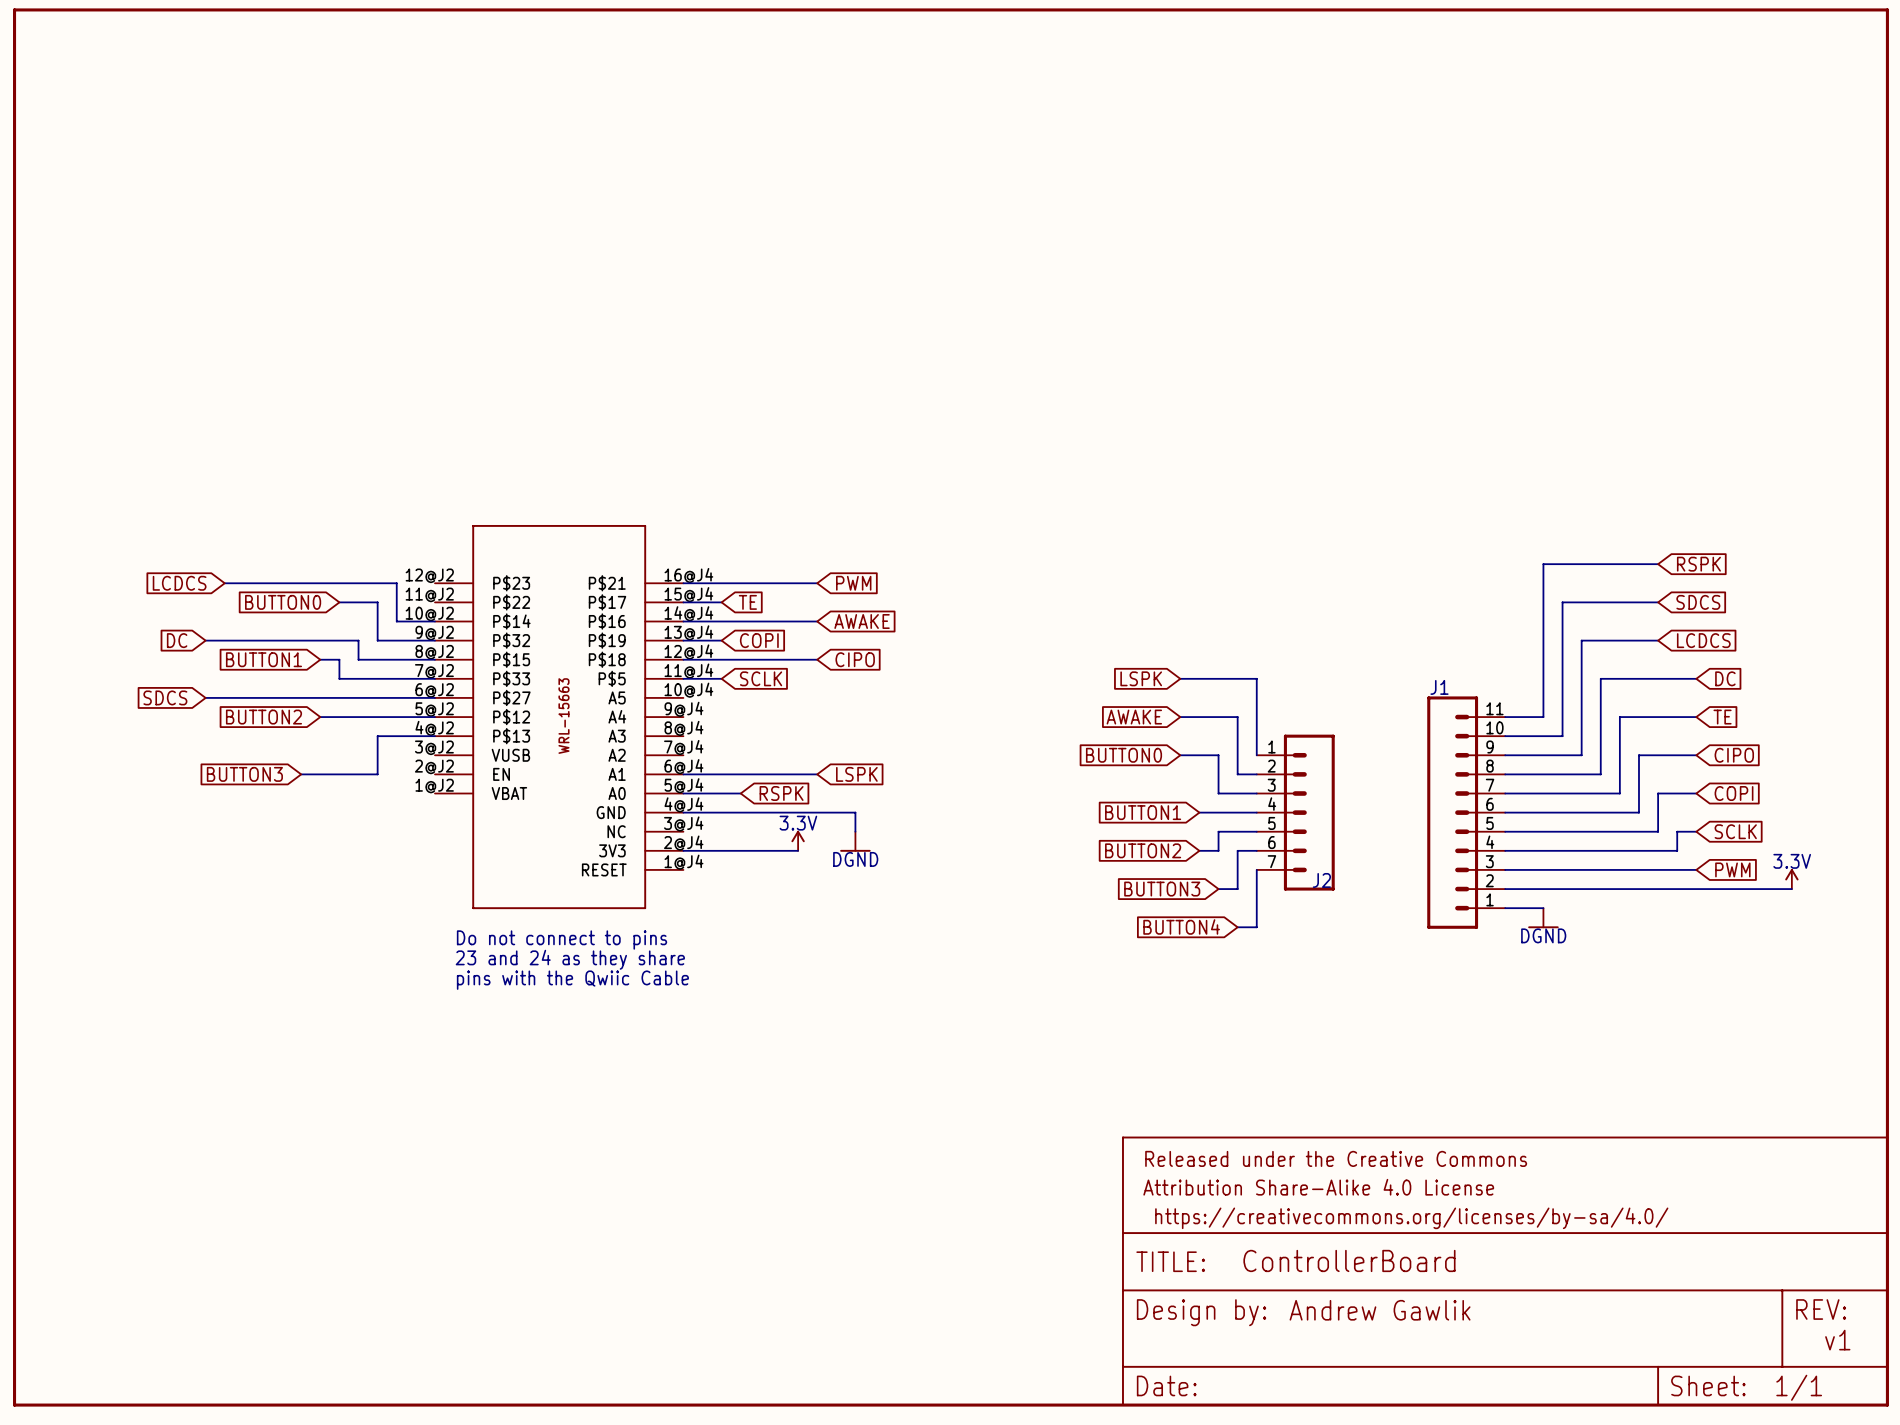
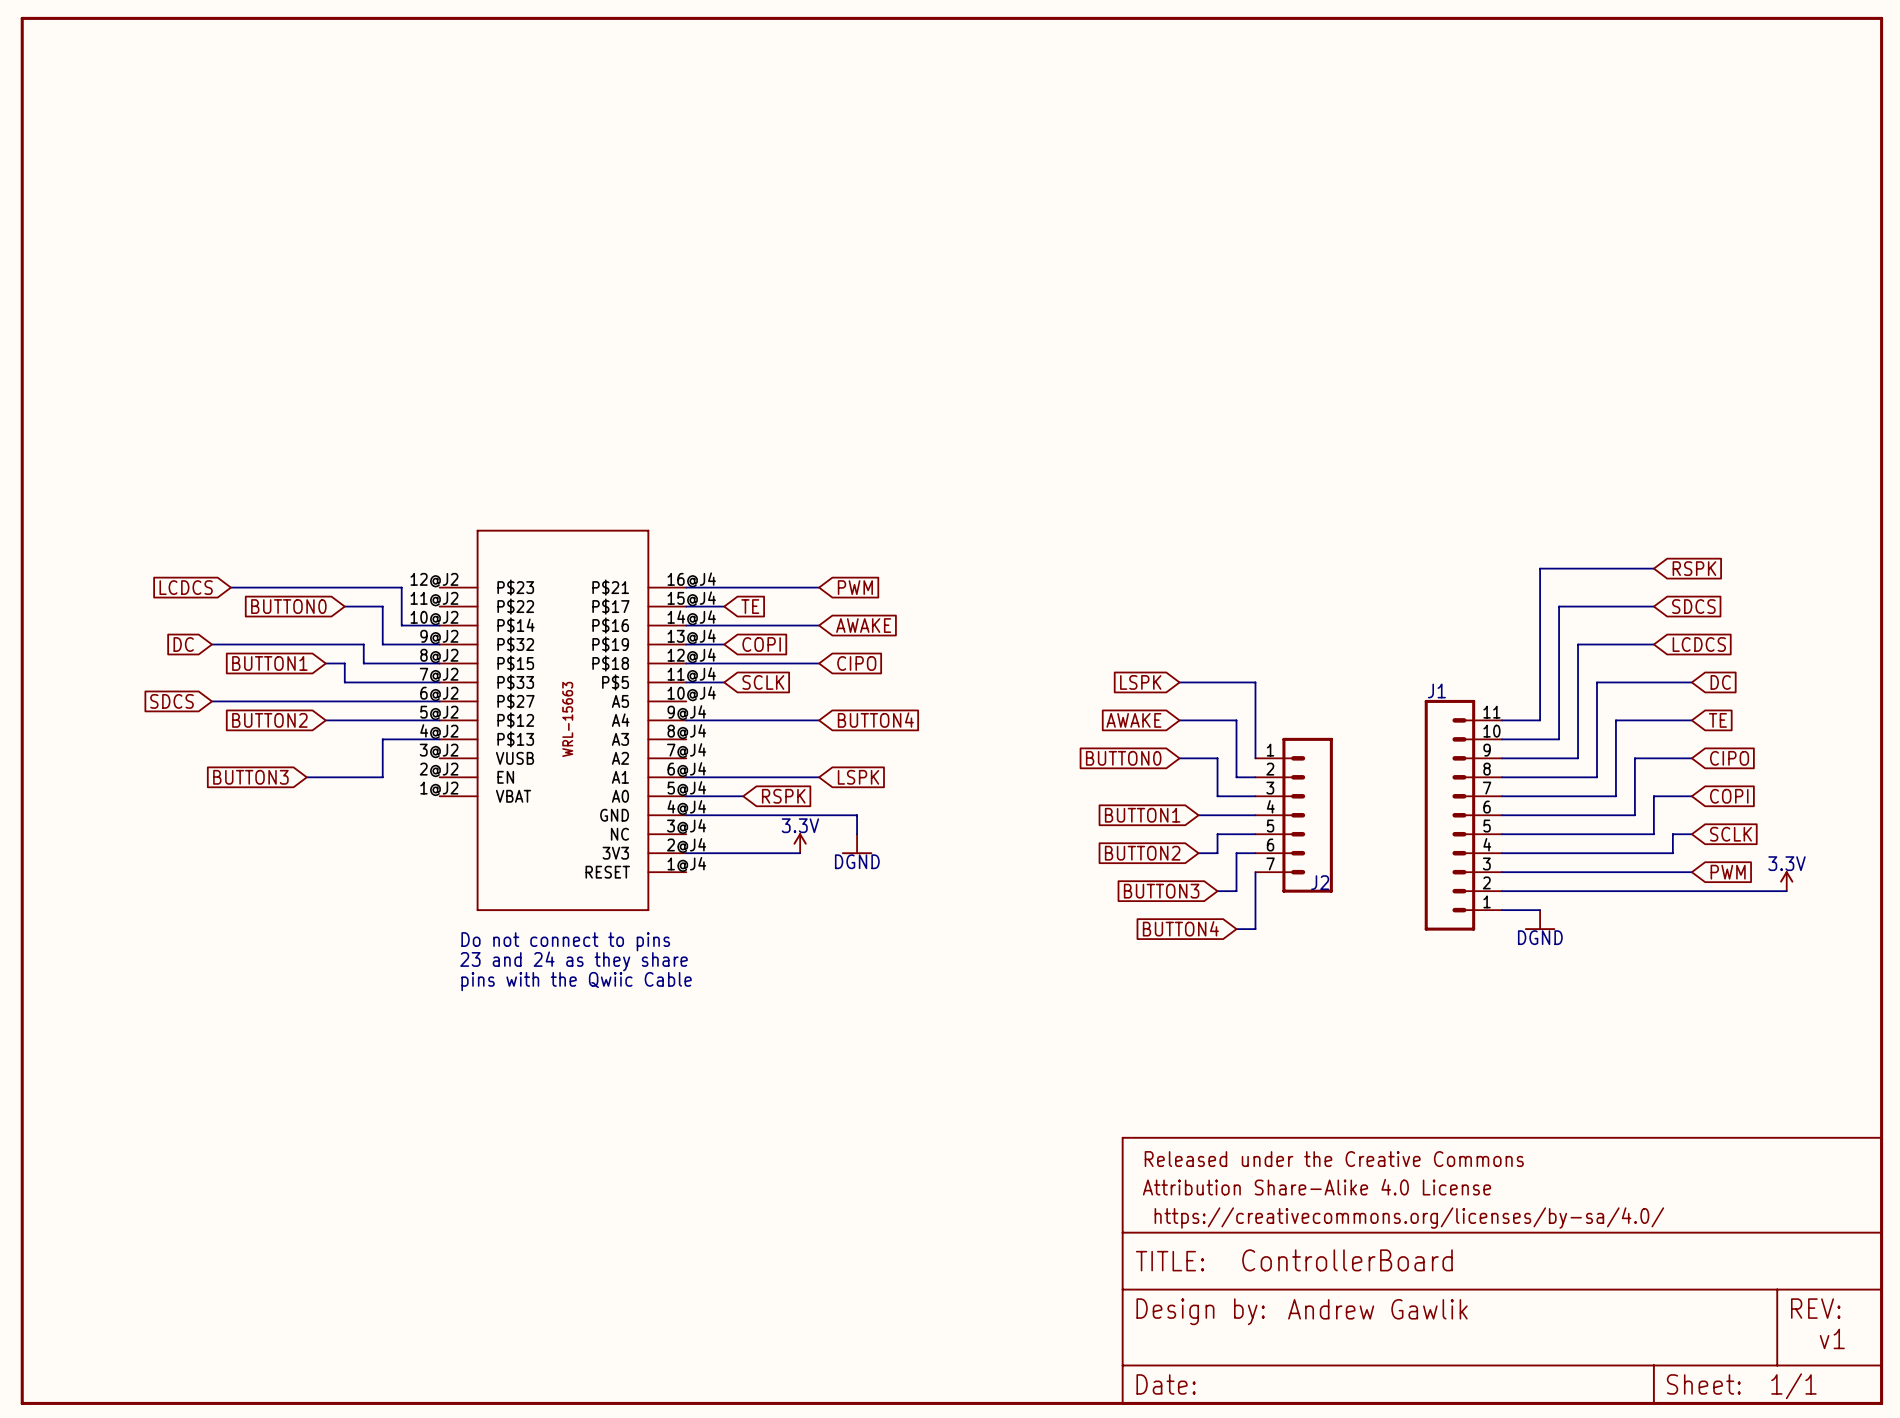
global label: none -> BUTTON4 (875, 720)
wire: none -> (686, 720) (819, 720)

